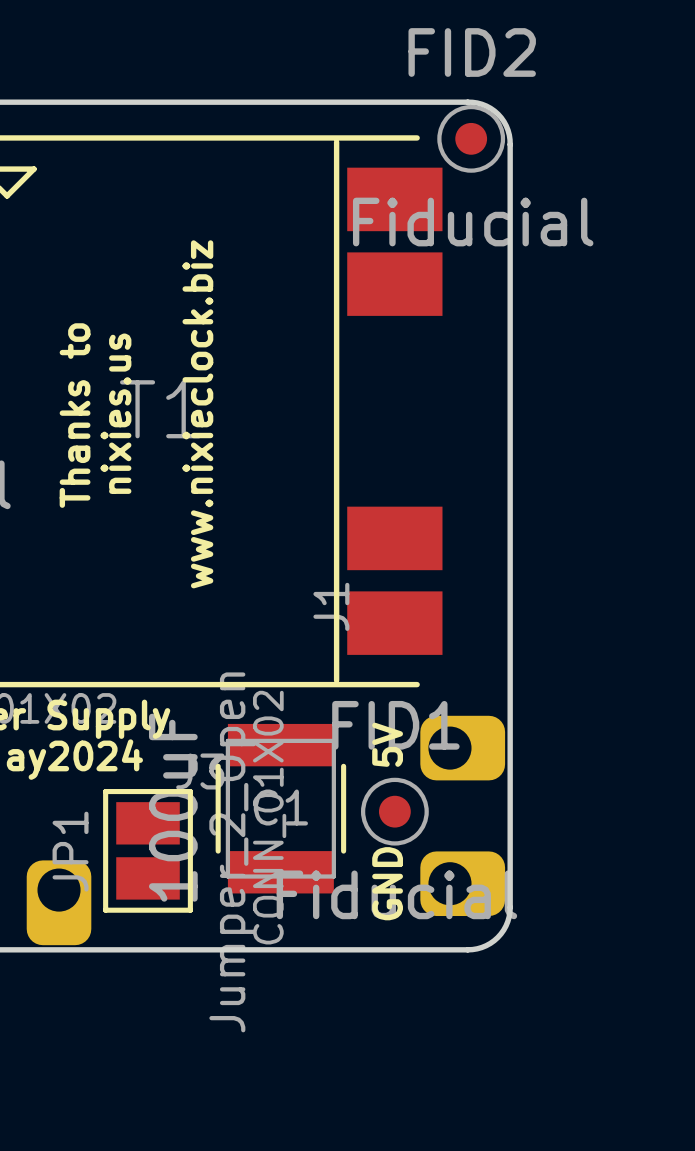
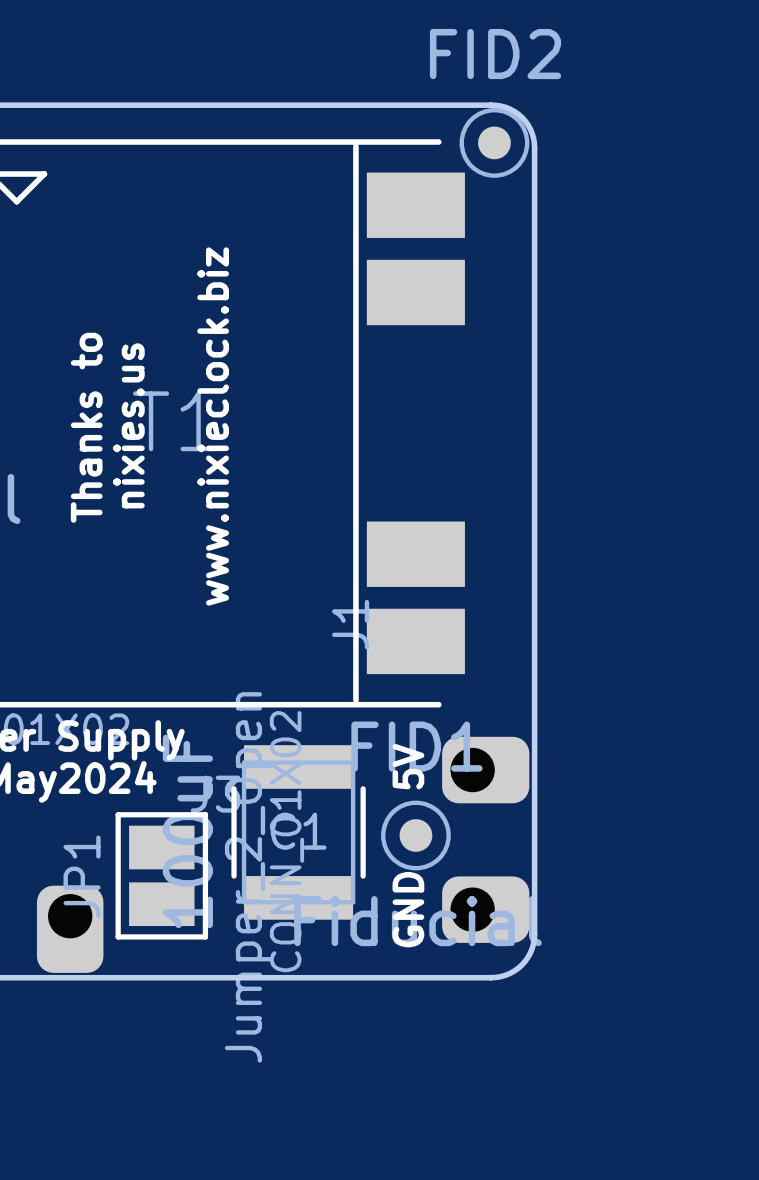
FID2 value: Fiducial (473, 222) -> none

